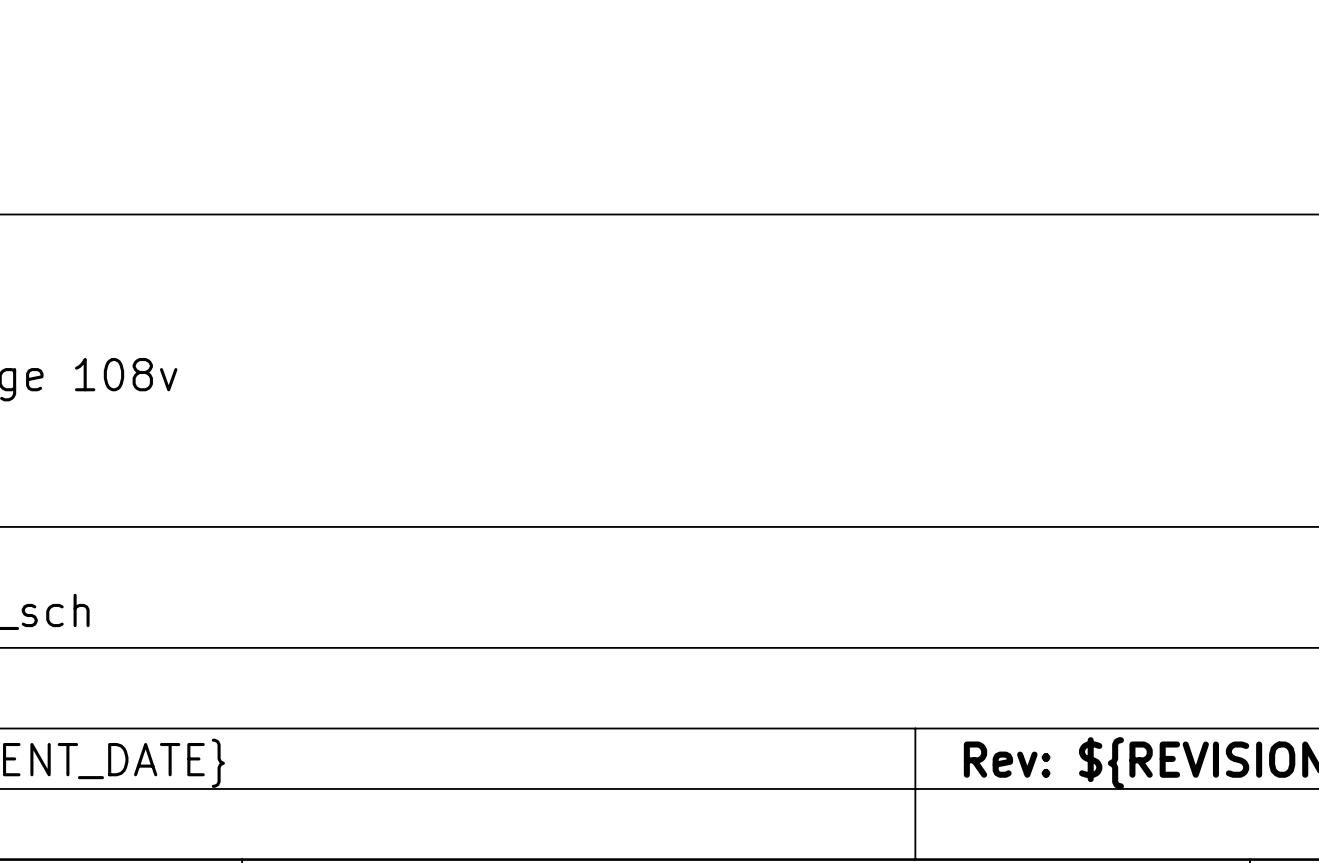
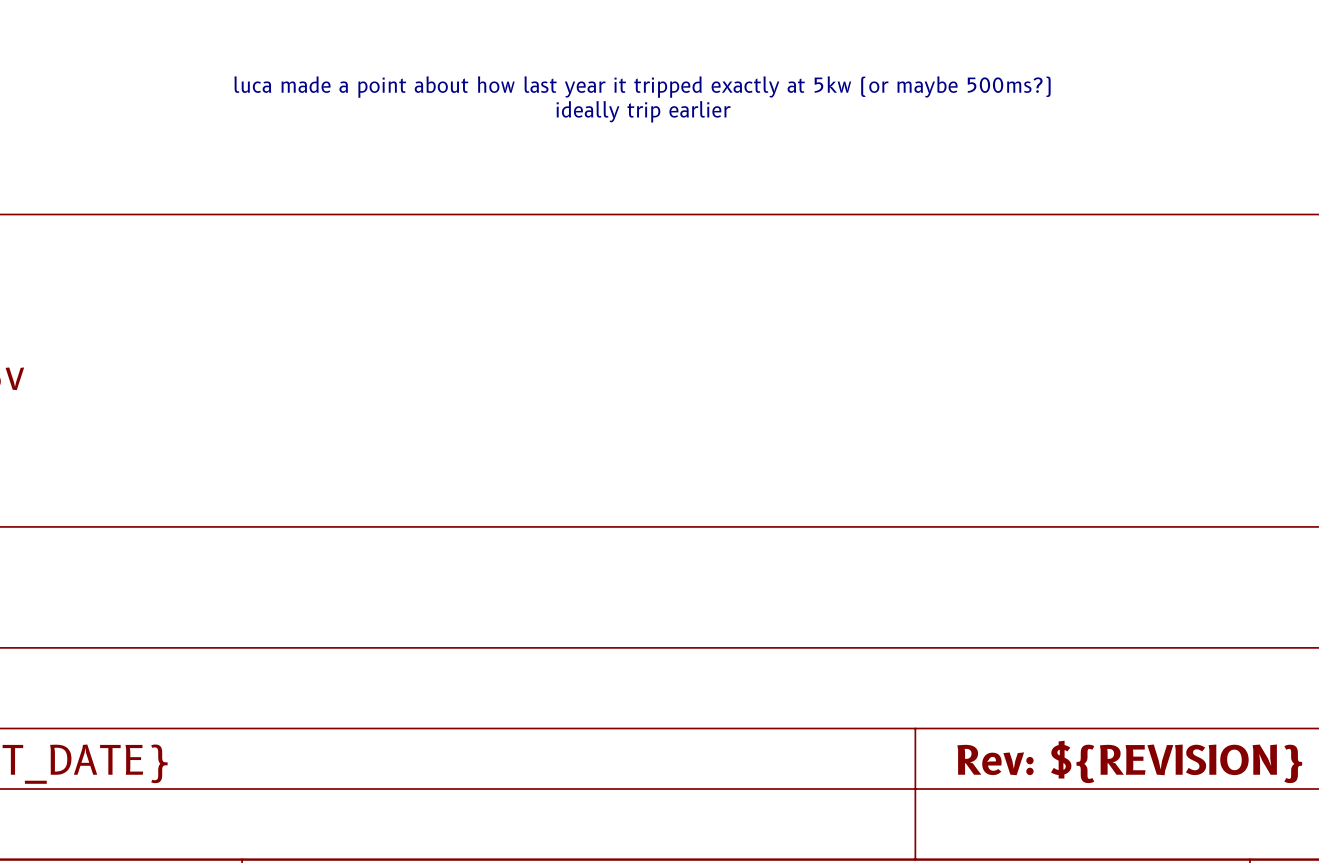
text: none -> luca made a point about how last year it tripped exactly at 5kw (or maybe 500ms?) (642, 87)
text: none -> ideally trip earlier (643, 111)

